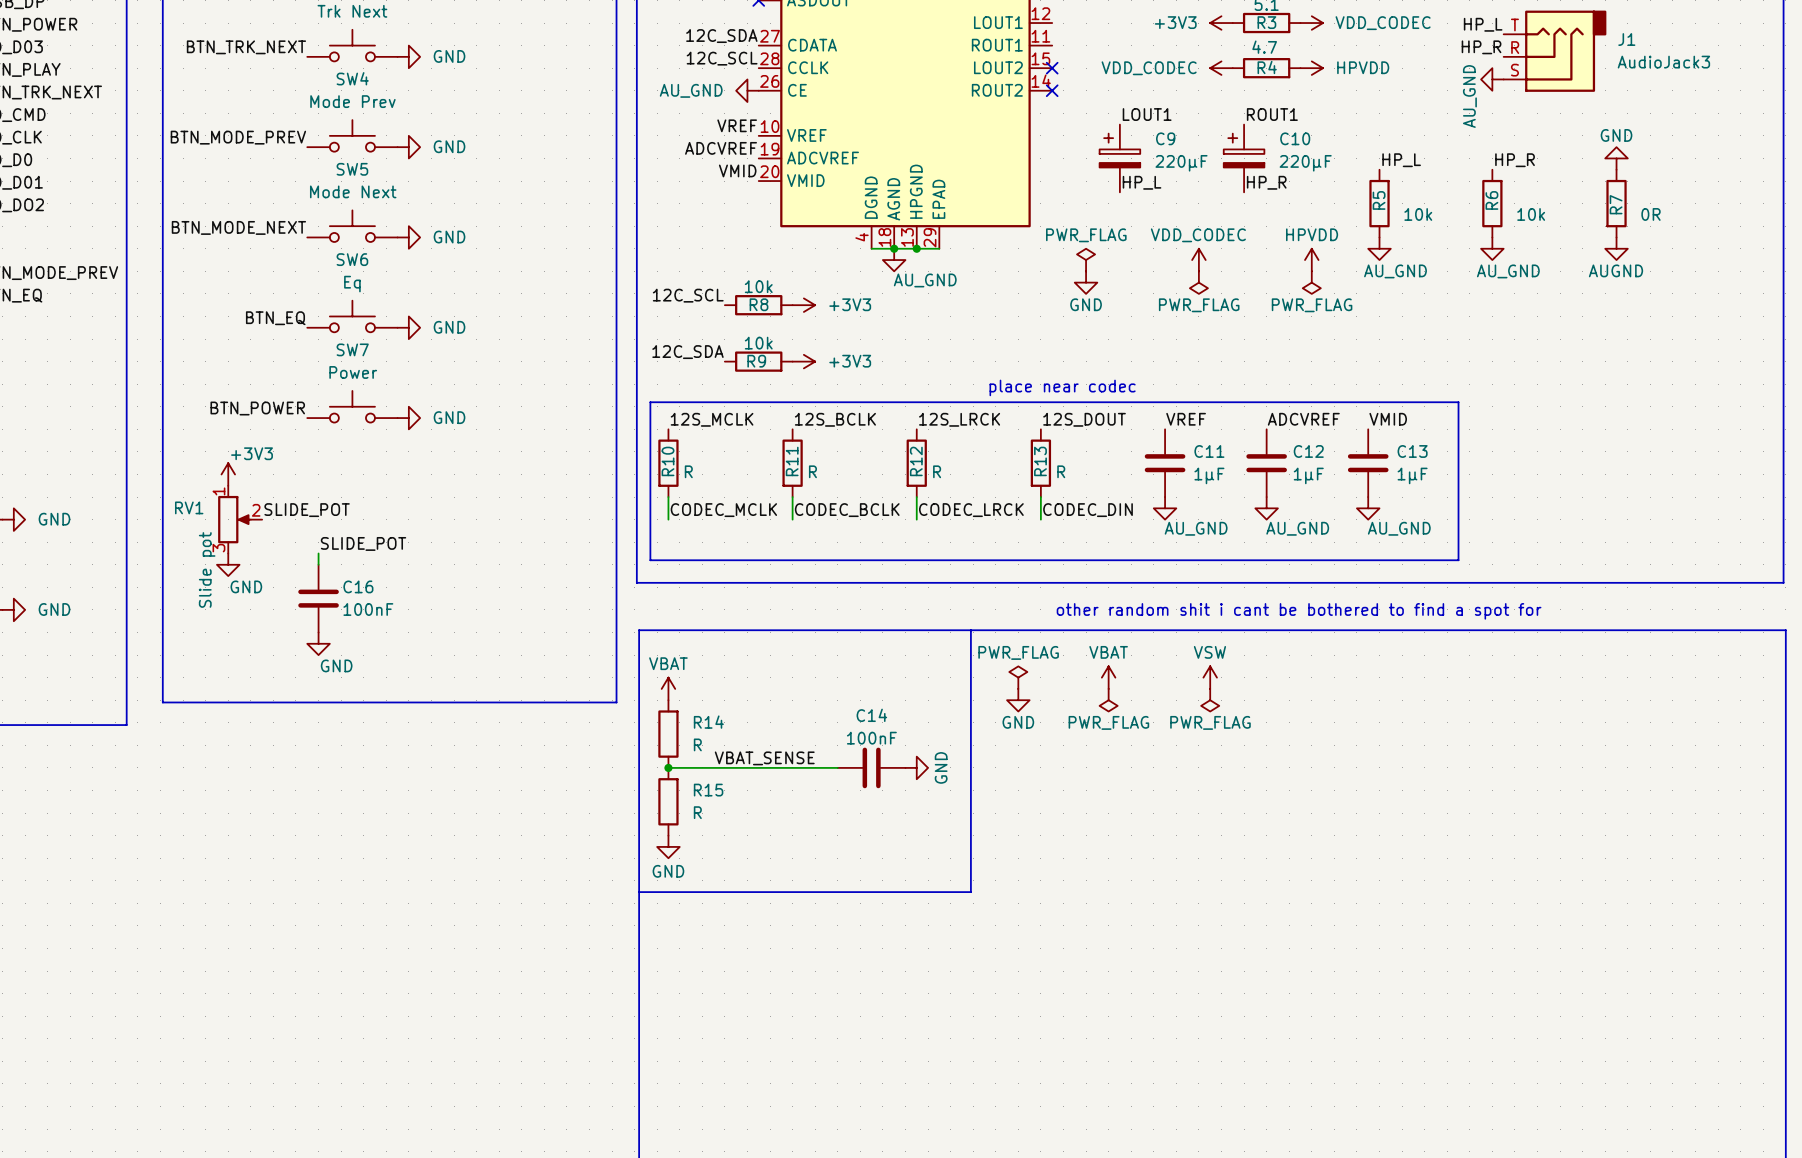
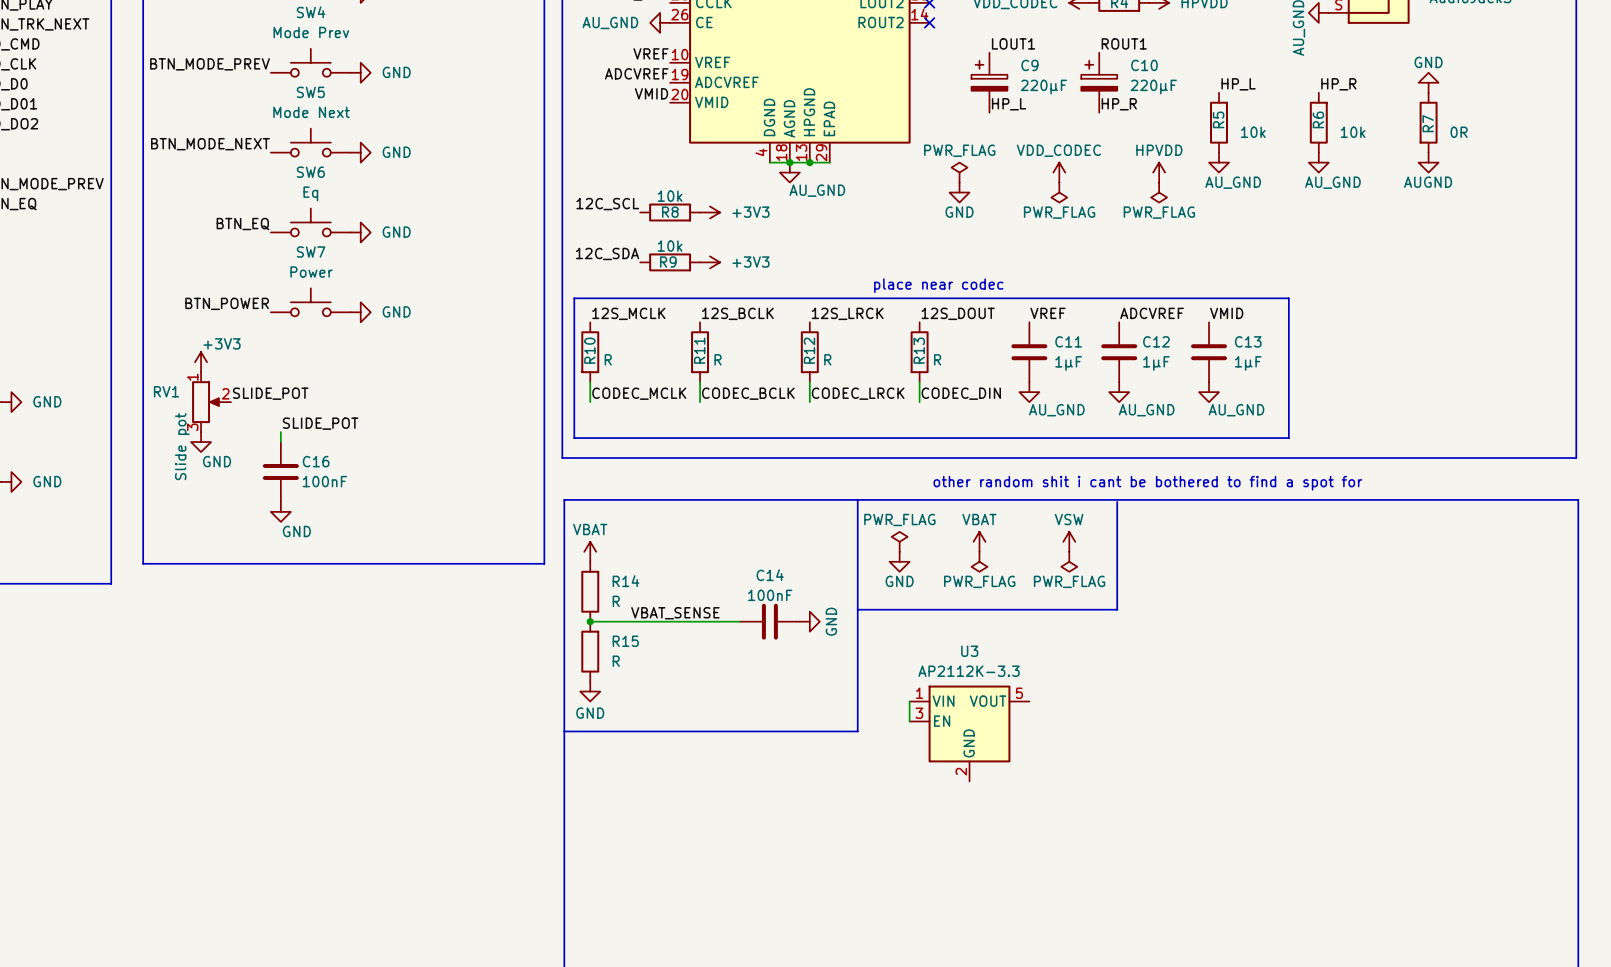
line: none -> (1117, 501) (1117, 609) (857, 609)
wire: none -> (909, 701) (909, 721)
U3: none -> AP2112K-3.3 (969, 733)

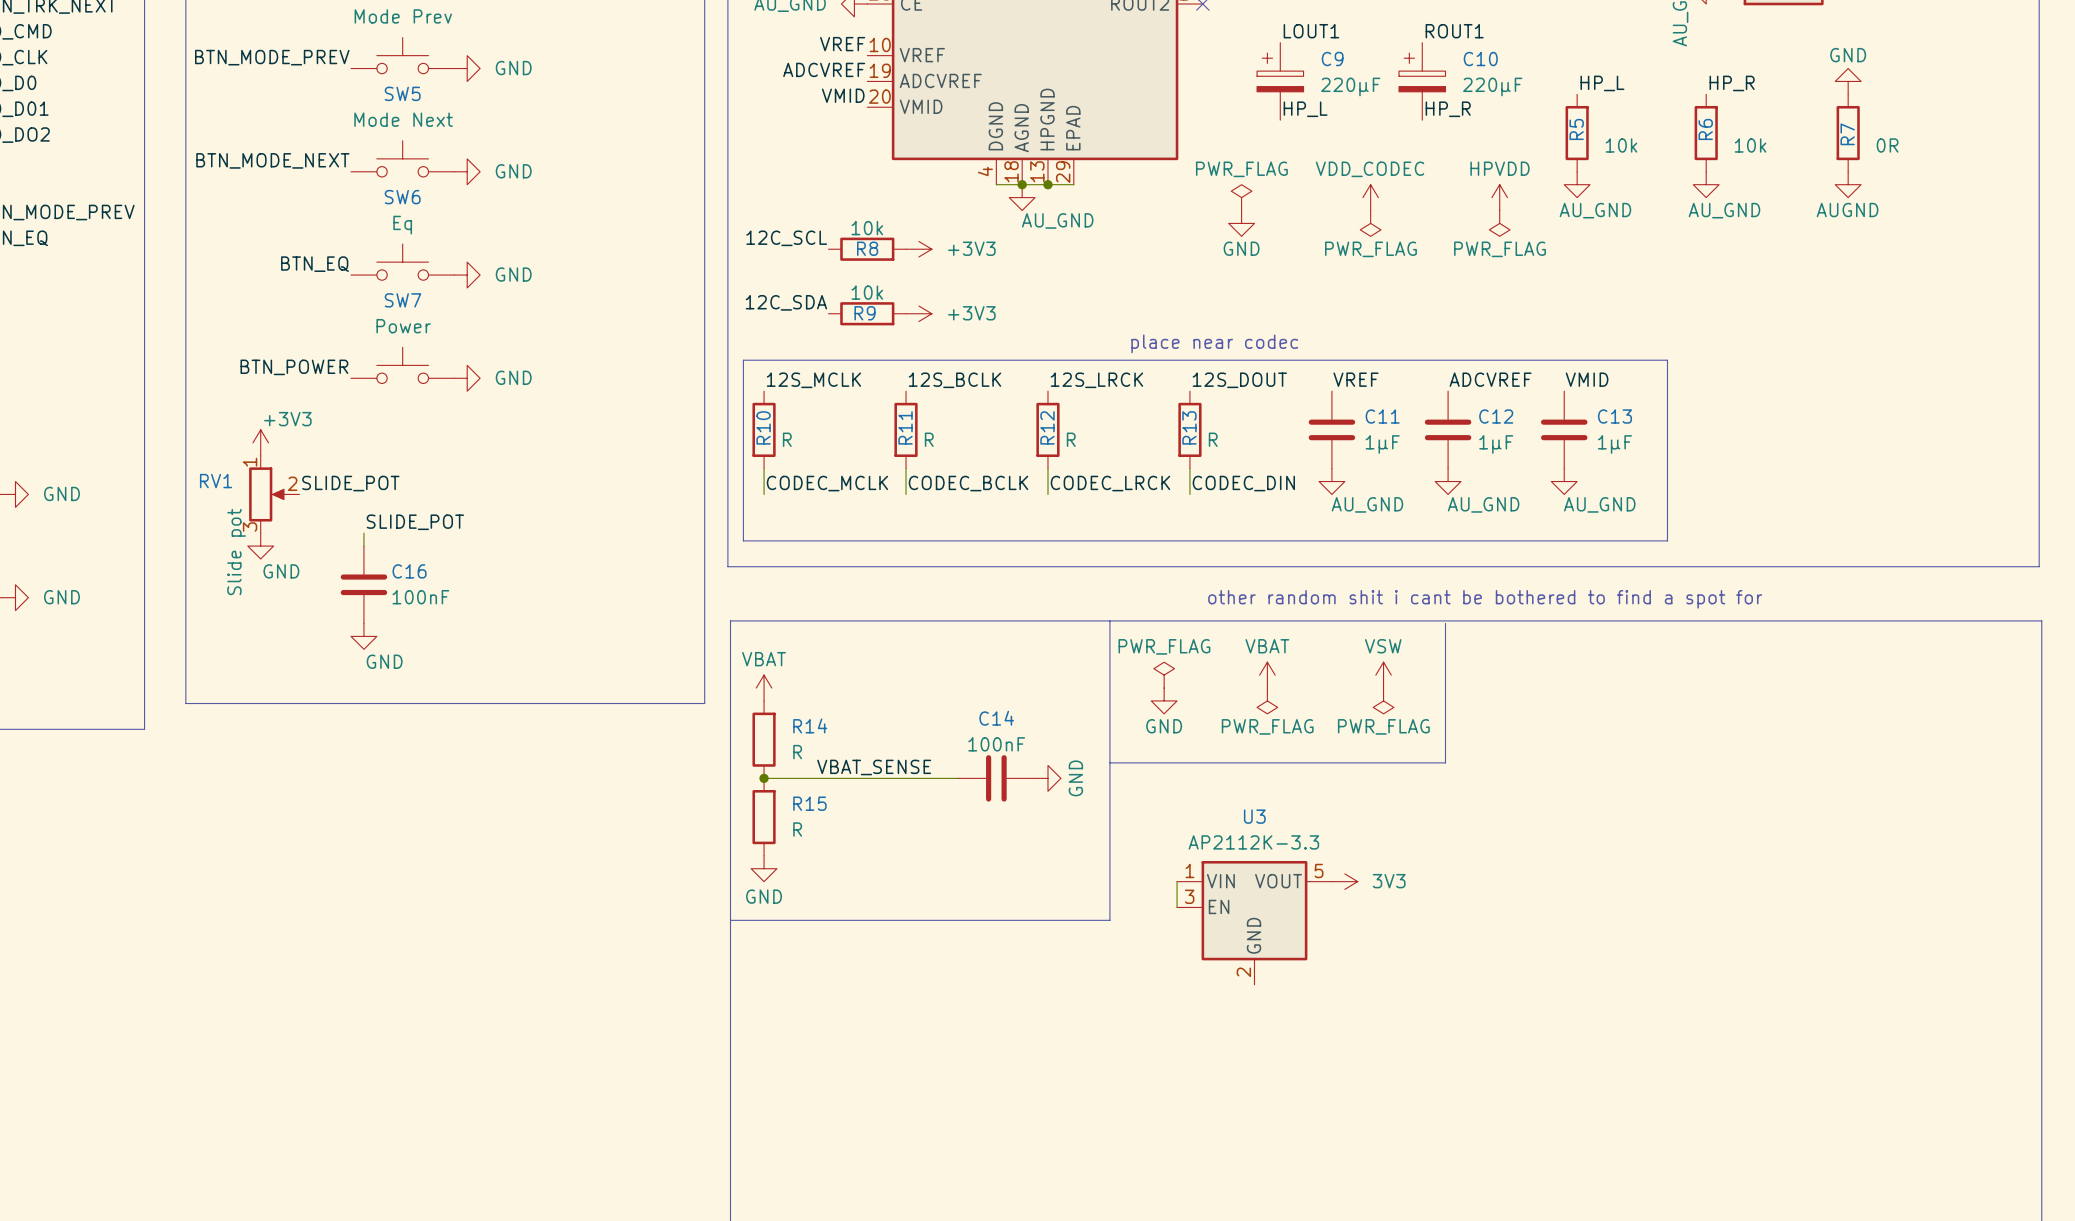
power symbol: none -> 3V3 (1344, 881)

